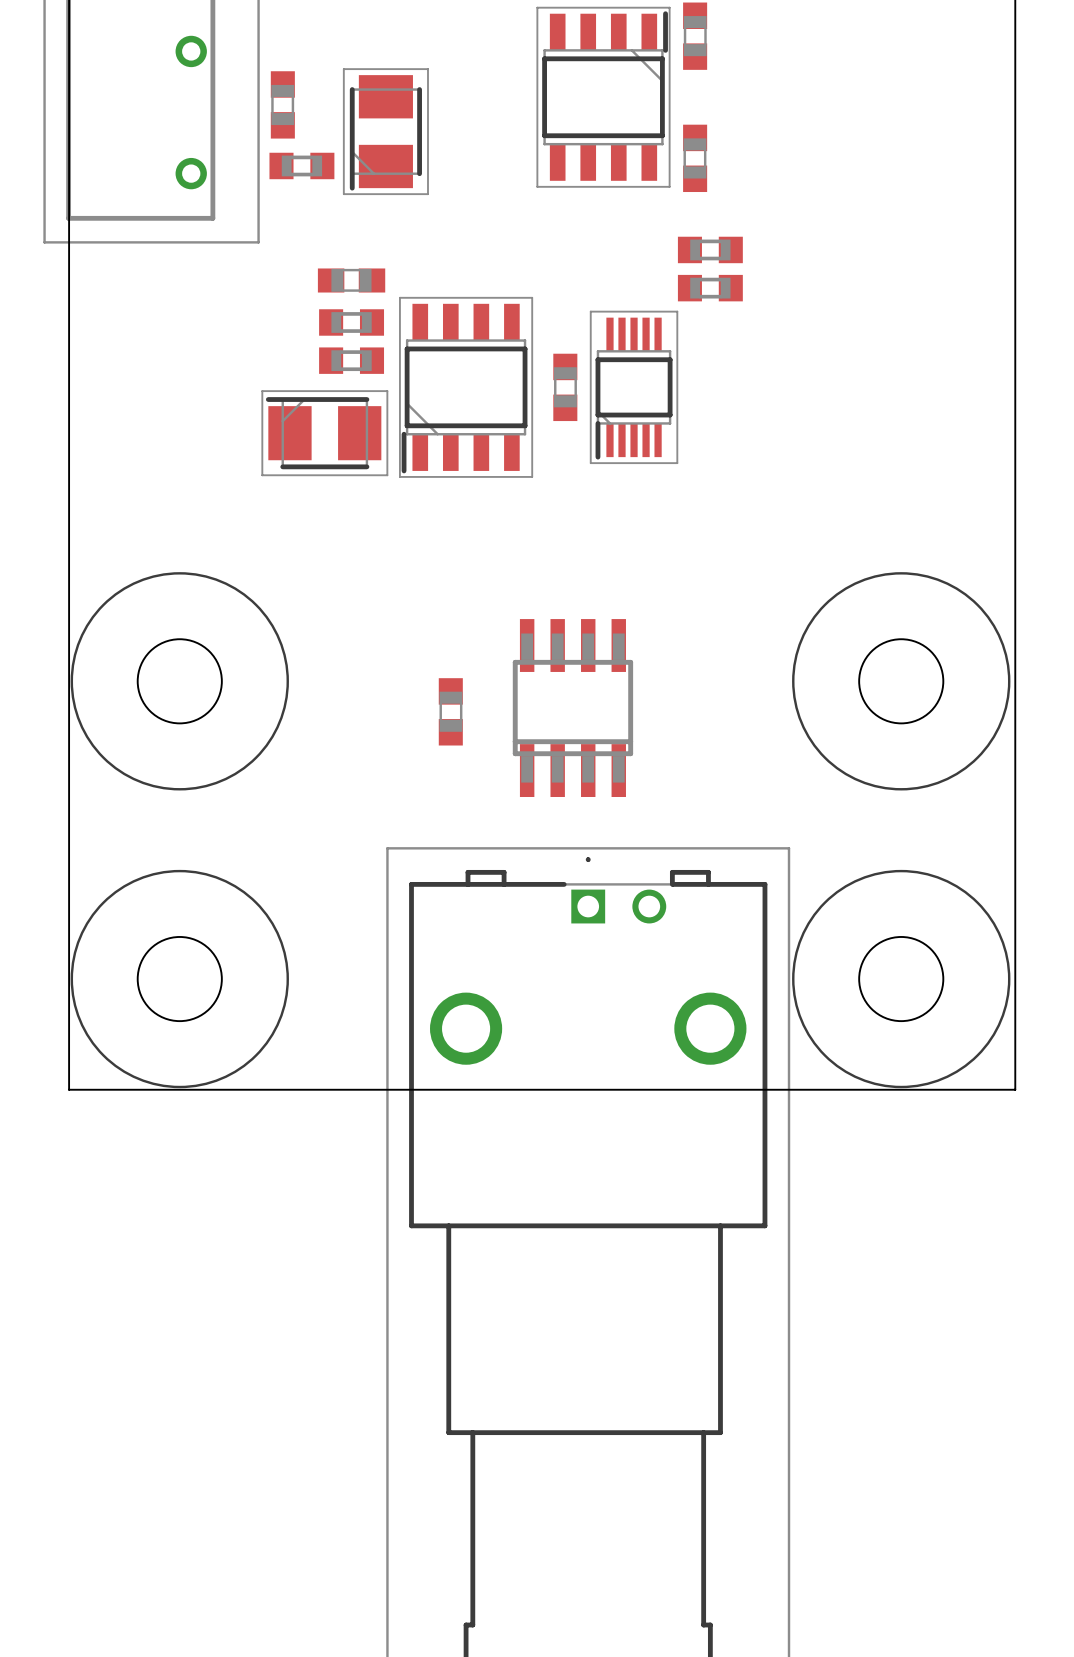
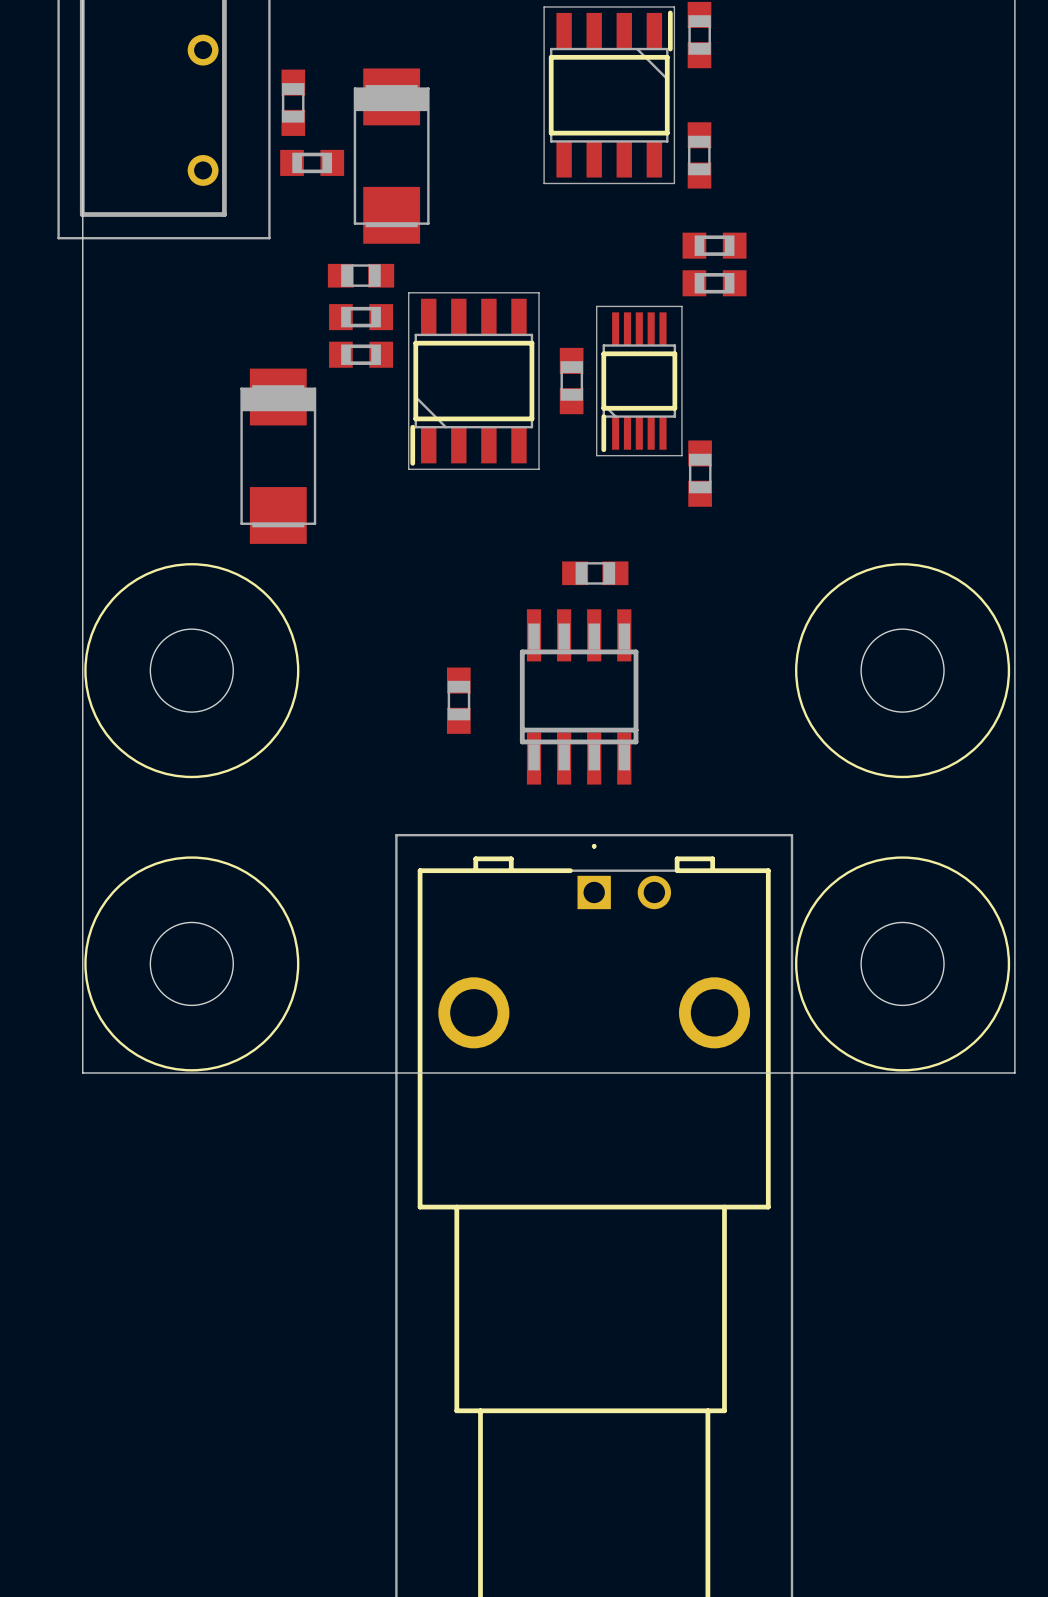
part: (385, 131) -> none
part: none -> (391, 156)
part: (324, 433) -> none
part: none -> (278, 456)
part: none -> (700, 473)
part: none -> (595, 573)

